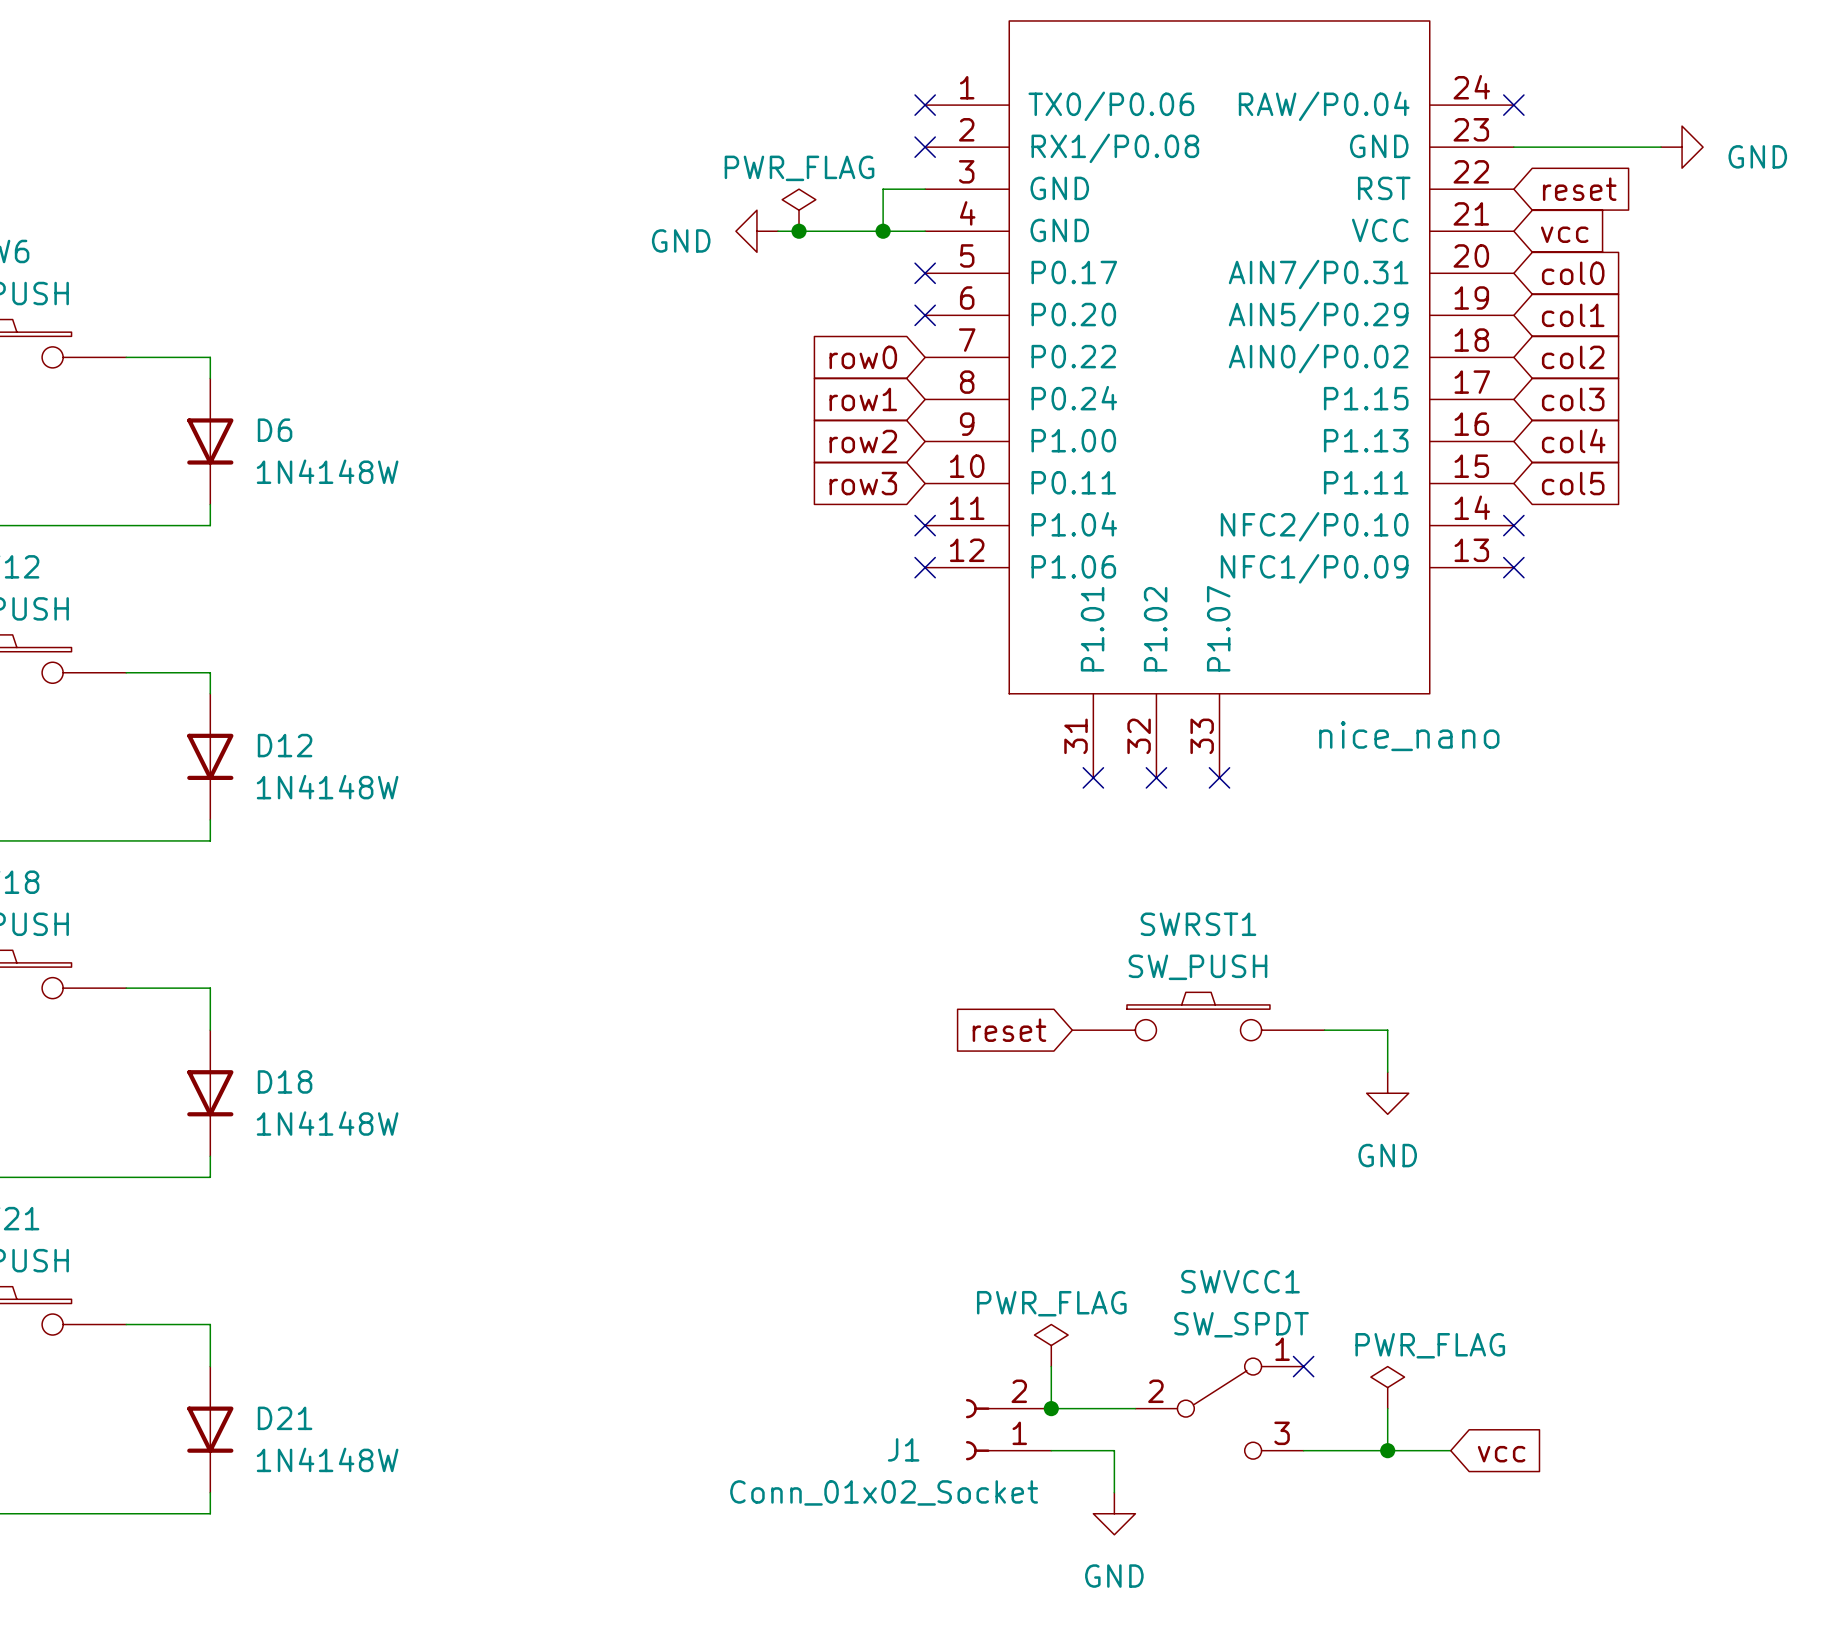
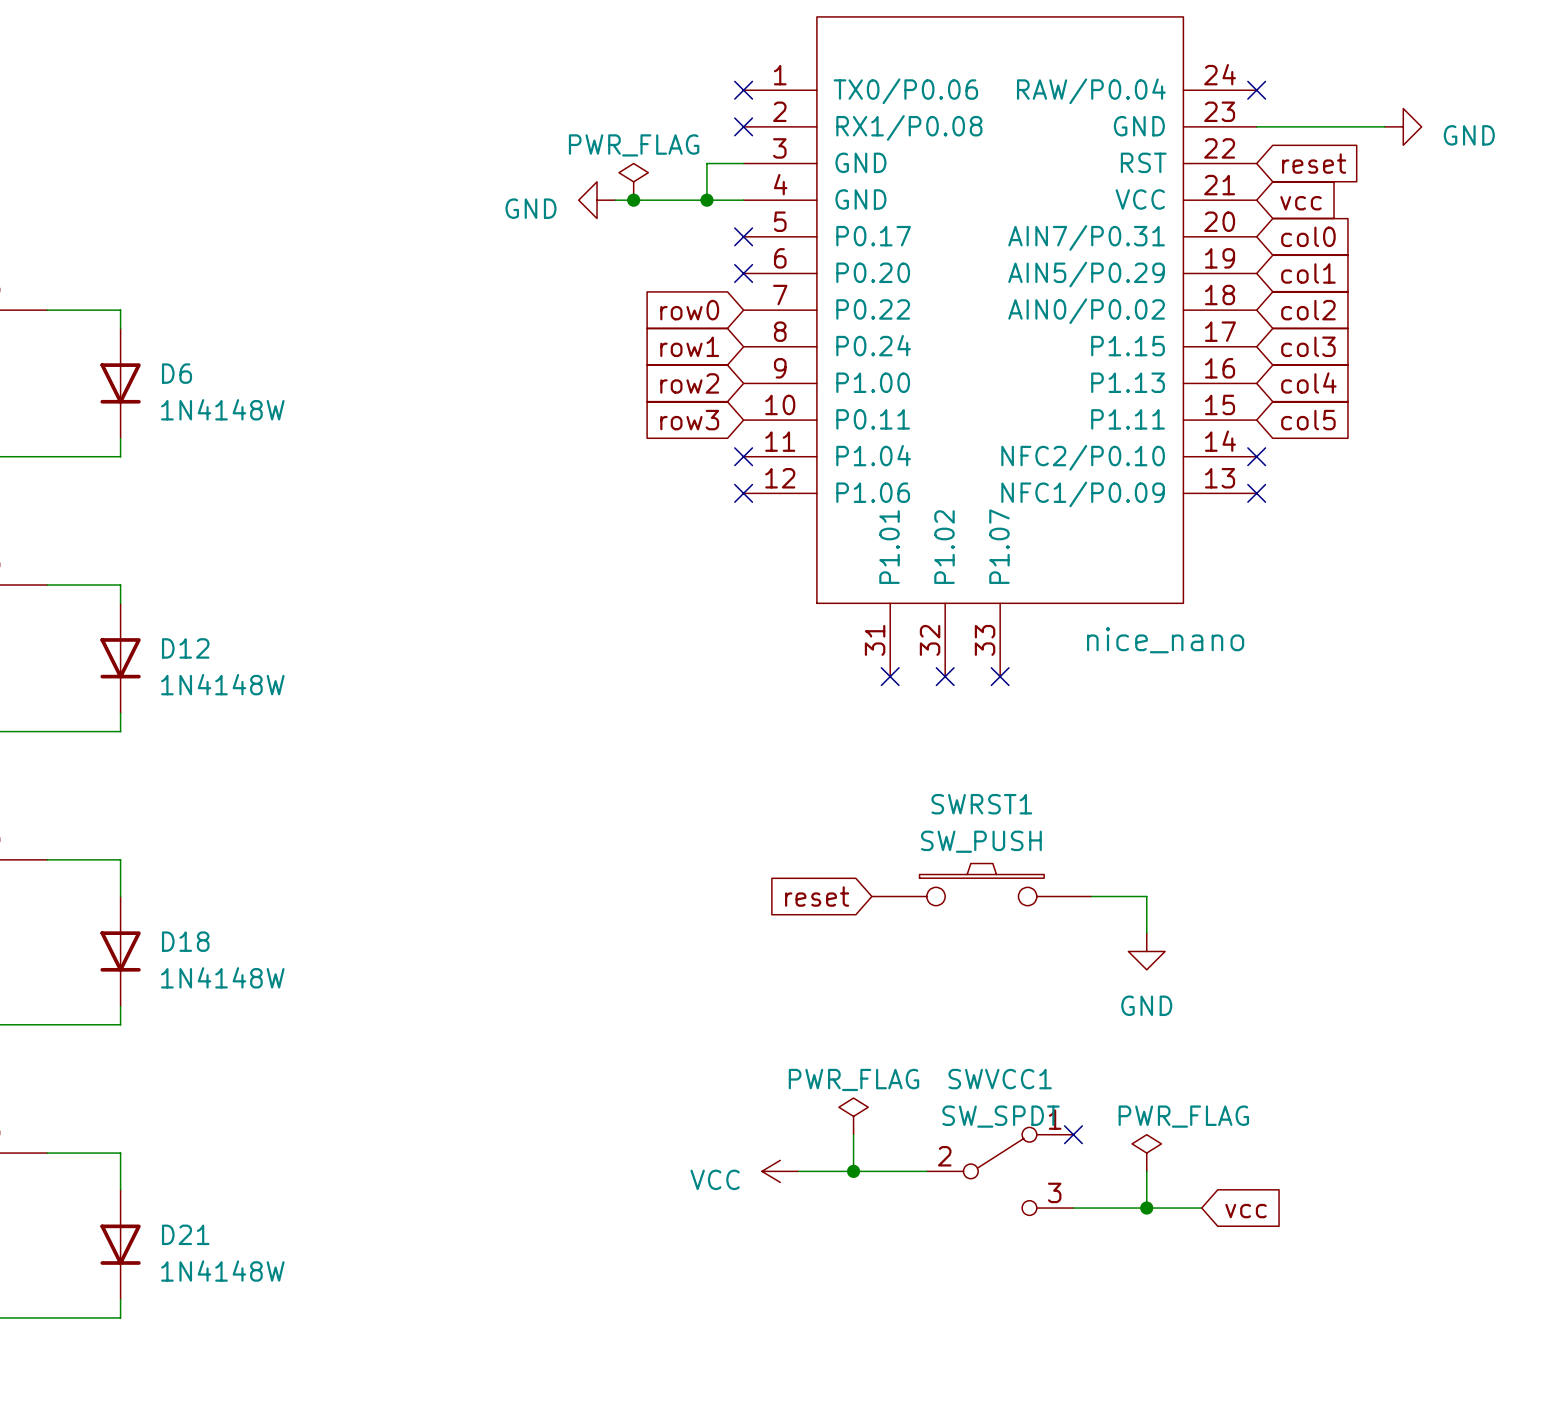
SWVCC1 name position: SWVCC1 (1240, 1281) -> SWVCC1 (1000, 1079)
wire: none -> (853, 1134) (853, 1171)
SWVCC1 value position: SW_SPDT (1241, 1324) -> SW_SPDT (1001, 1116)
power symbol: none -> VCC (780, 1171)
wire: none -> (798, 1171) (926, 1171)
power symbol position: PWR_FLAG (1051, 1345) -> PWR_FLAG (853, 1116)
wire: (1051, 1366) (1051, 1408) (1135, 1408) -> none
no-connect mark position: (1303, 1366) -> (1073, 1134)
power symbol position: PWR_FLAG (1387, 1387) -> PWR_FLAG (1146, 1153)
junction position: (1051, 1408) -> (853, 1171)
SWVCC1 position: (1219, 1408) -> (1000, 1171)
wire: (1387, 1408) (1387, 1450) -> (1146, 1171) (1146, 1208)
J1: Conn_01x02_Socket (1008, 1429) -> none
wire: (1051, 1450) (1114, 1450) (1114, 1492) -> none
wire: (1303, 1450) (1450, 1450) -> (1073, 1208) (1201, 1208)
junction position: (1387, 1450) -> (1146, 1208)
global label position: vcc (1501, 1454) -> vcc (1246, 1211)
power symbol: GND (1114, 1513) -> none

